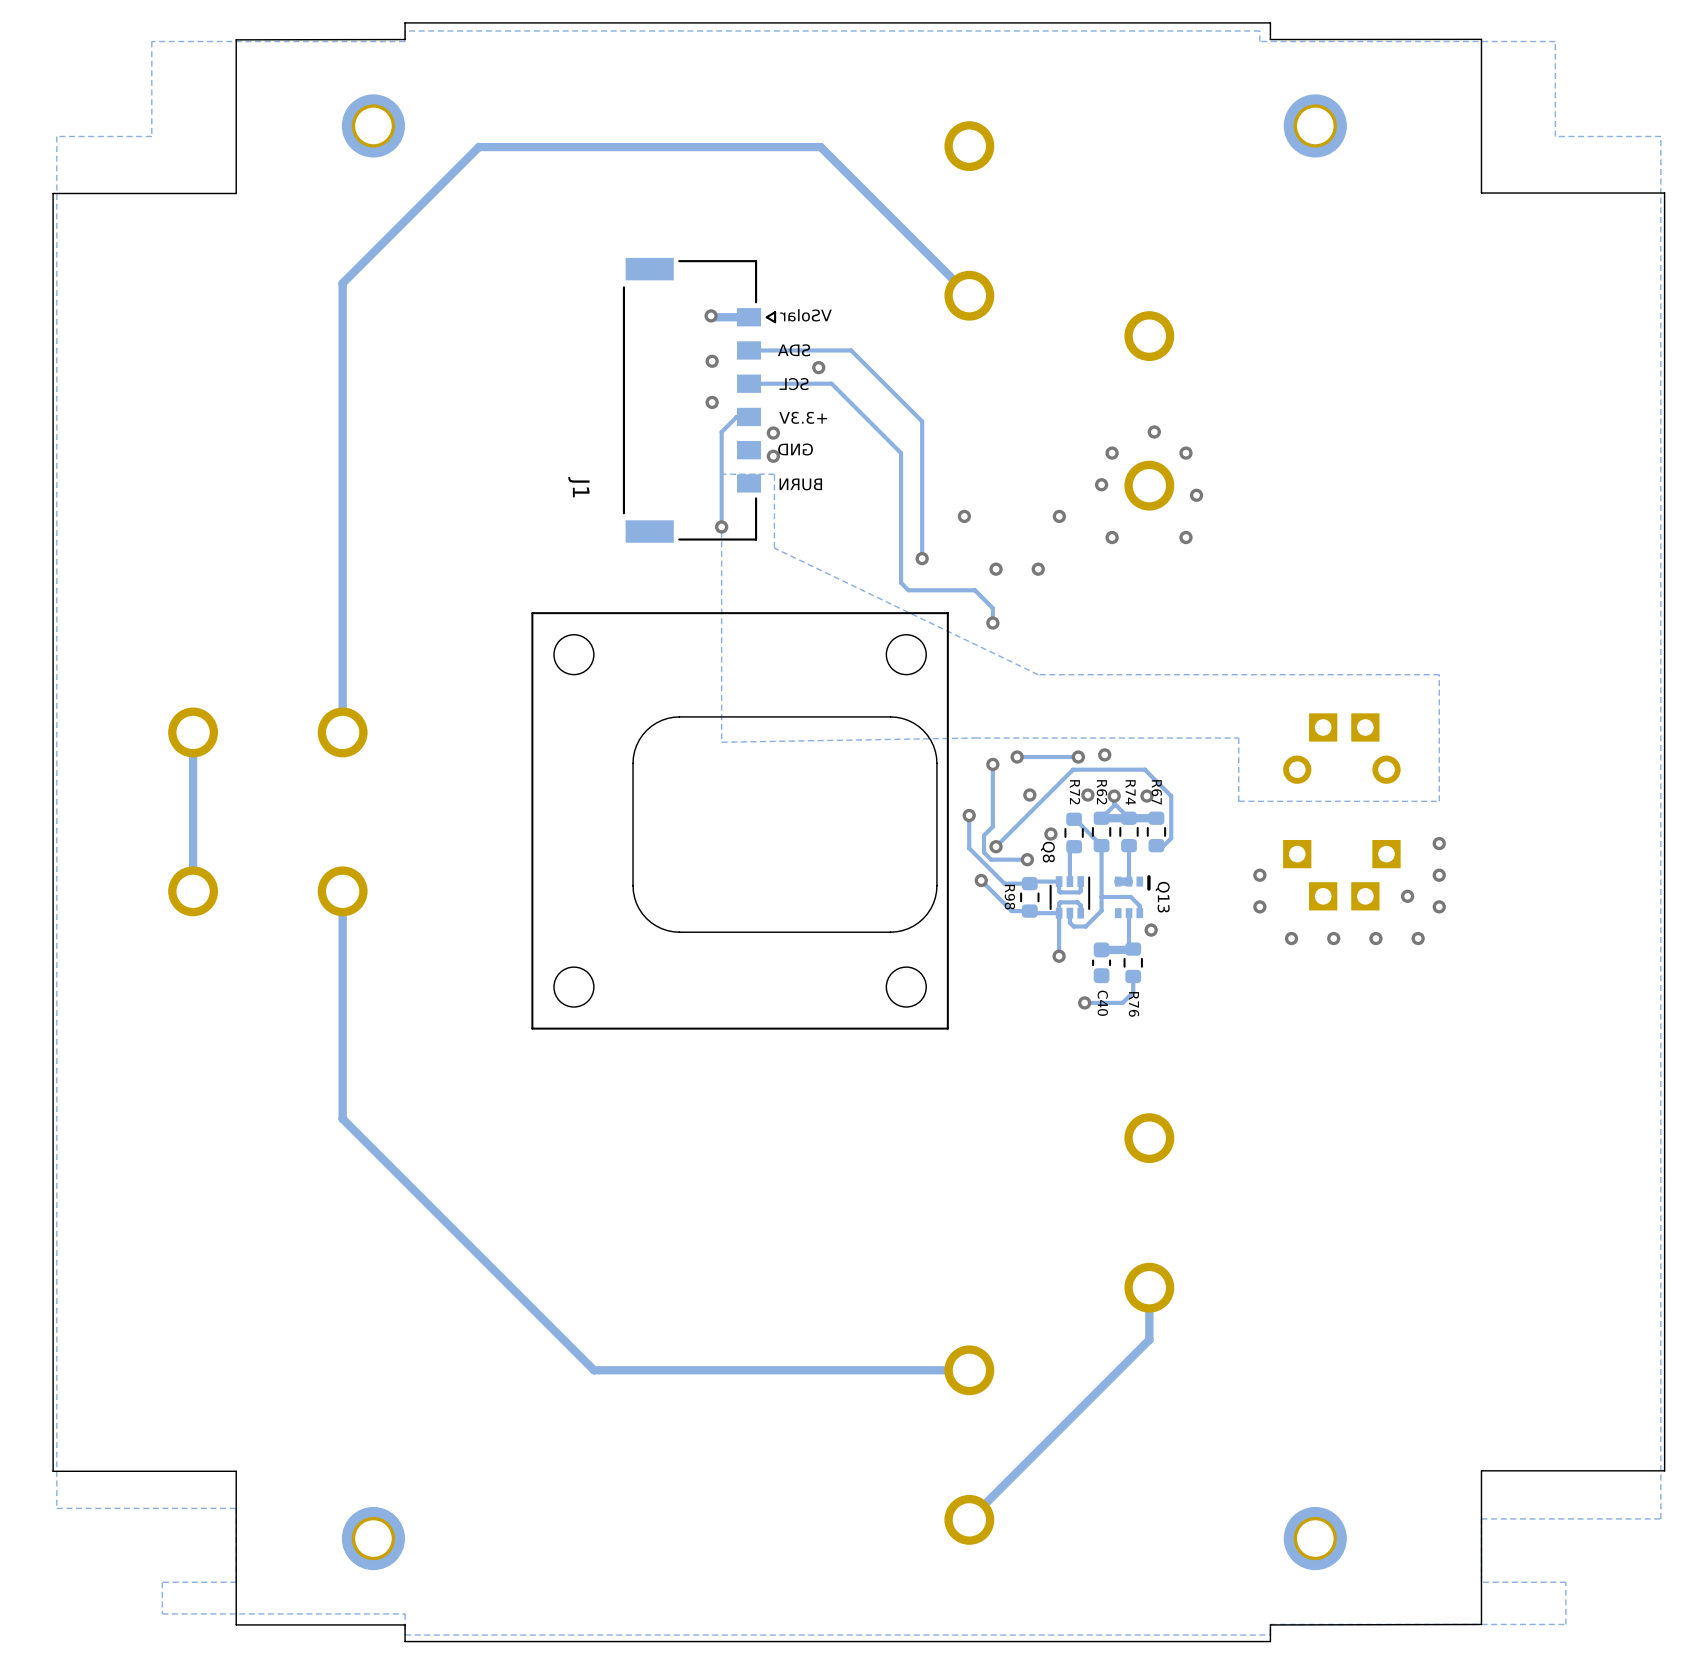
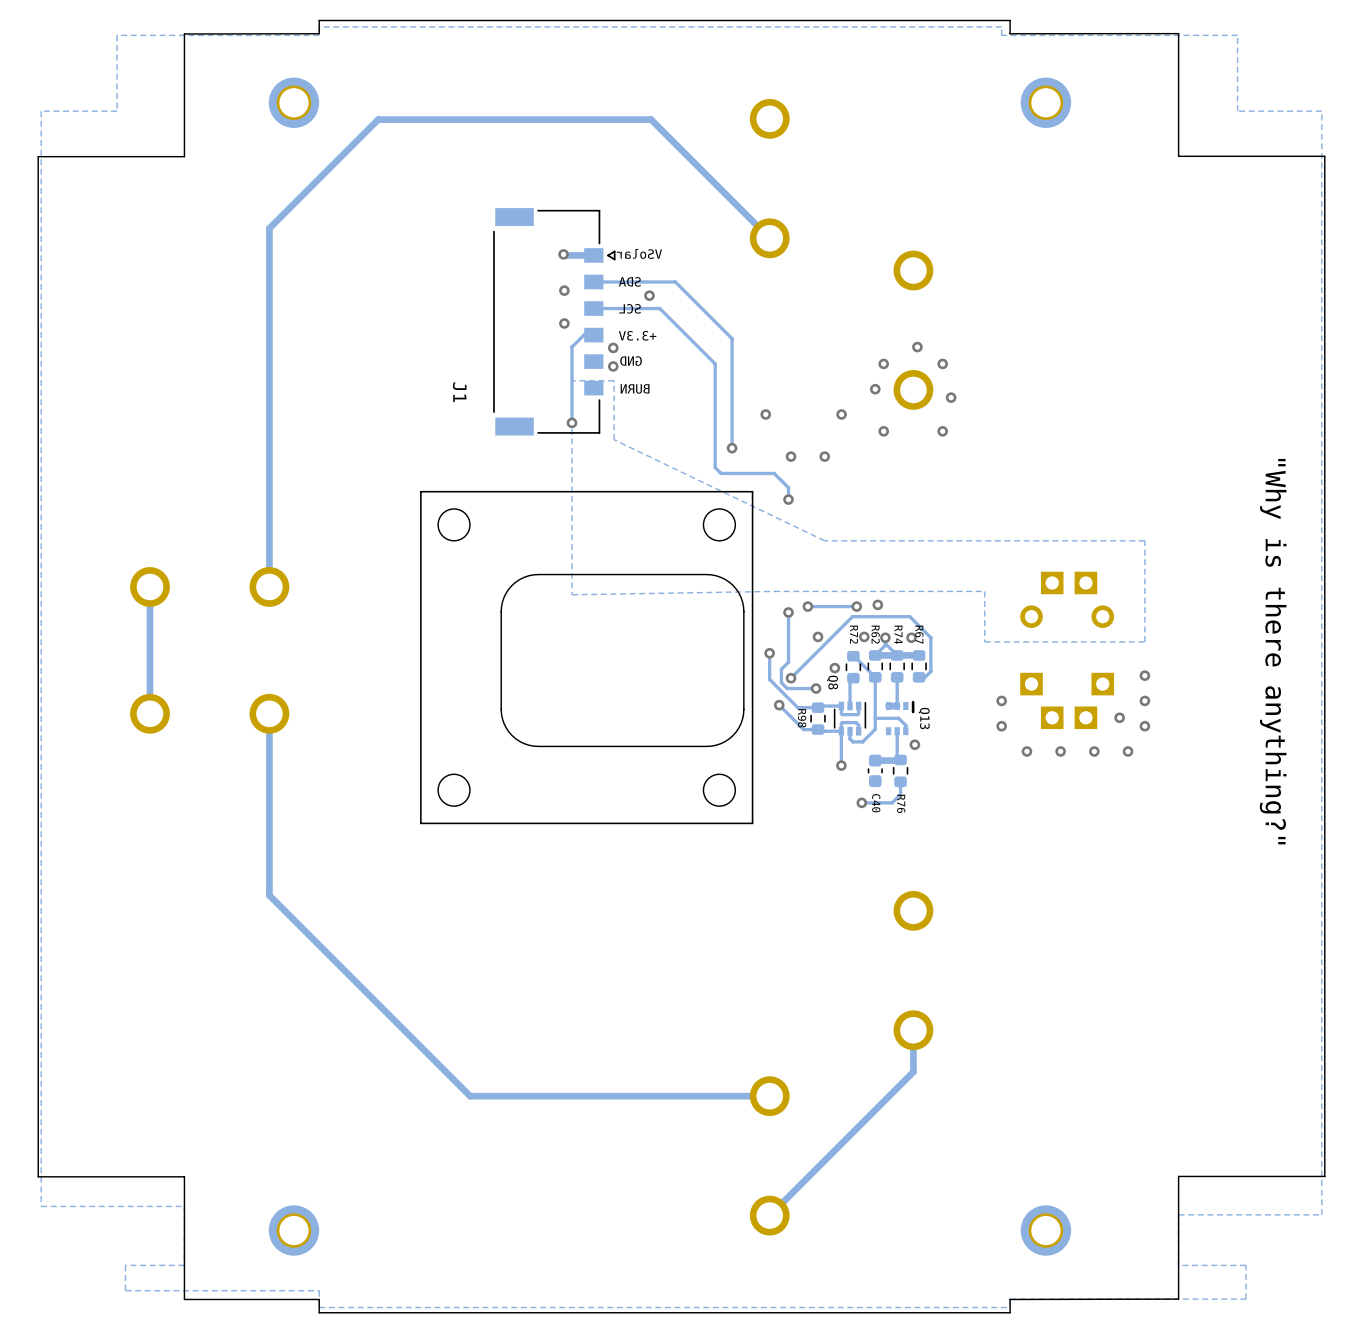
text: none -> "Why is there anything?" (1273, 651)

